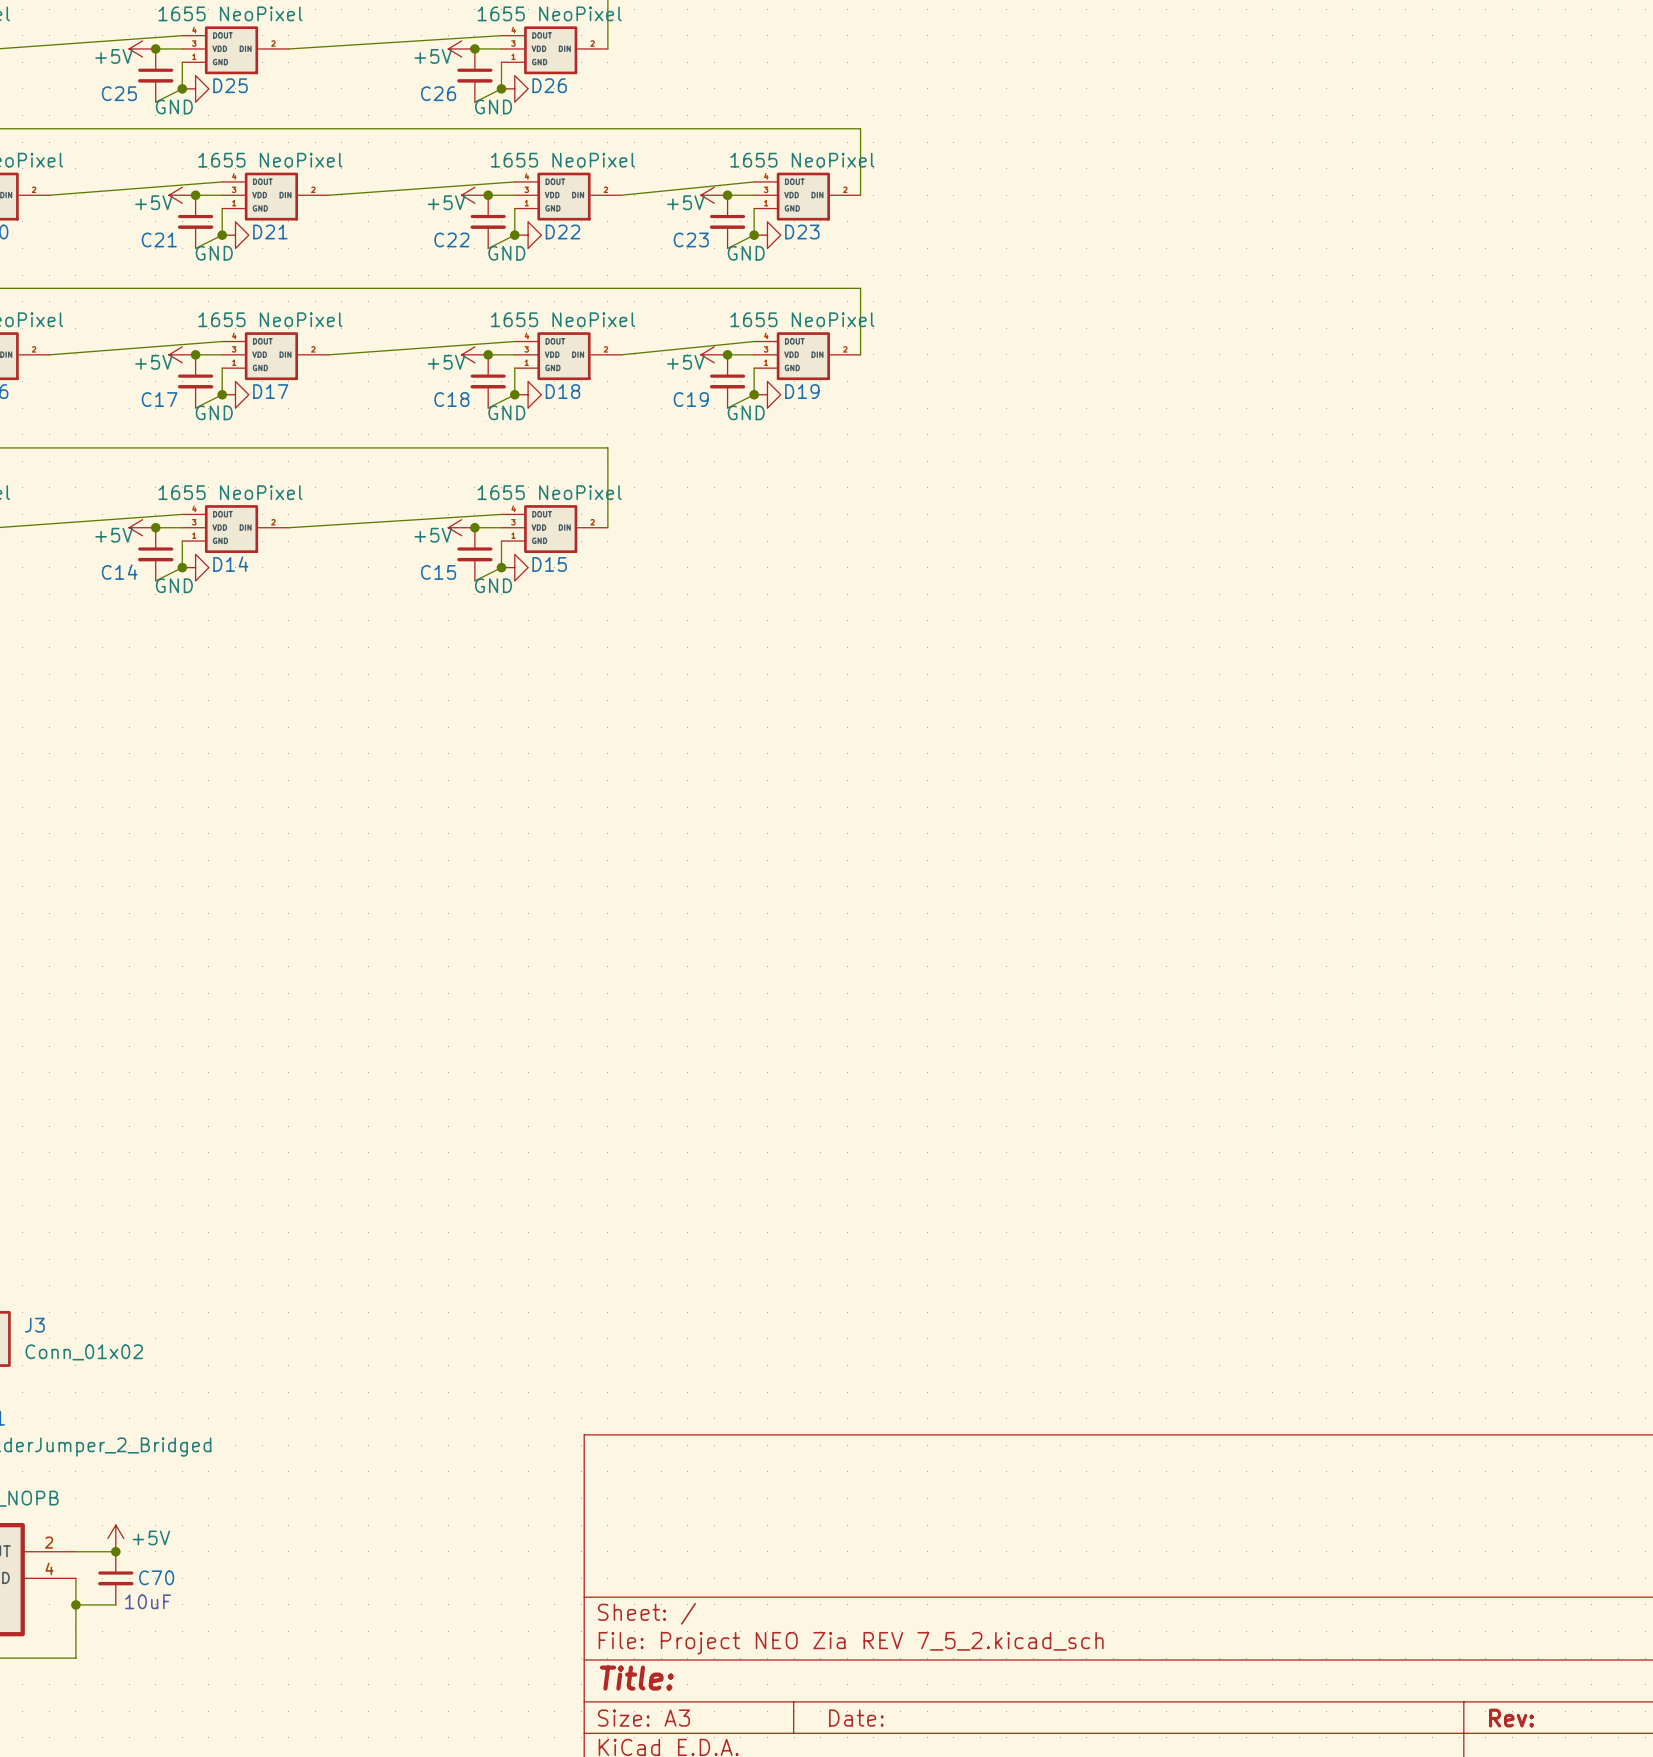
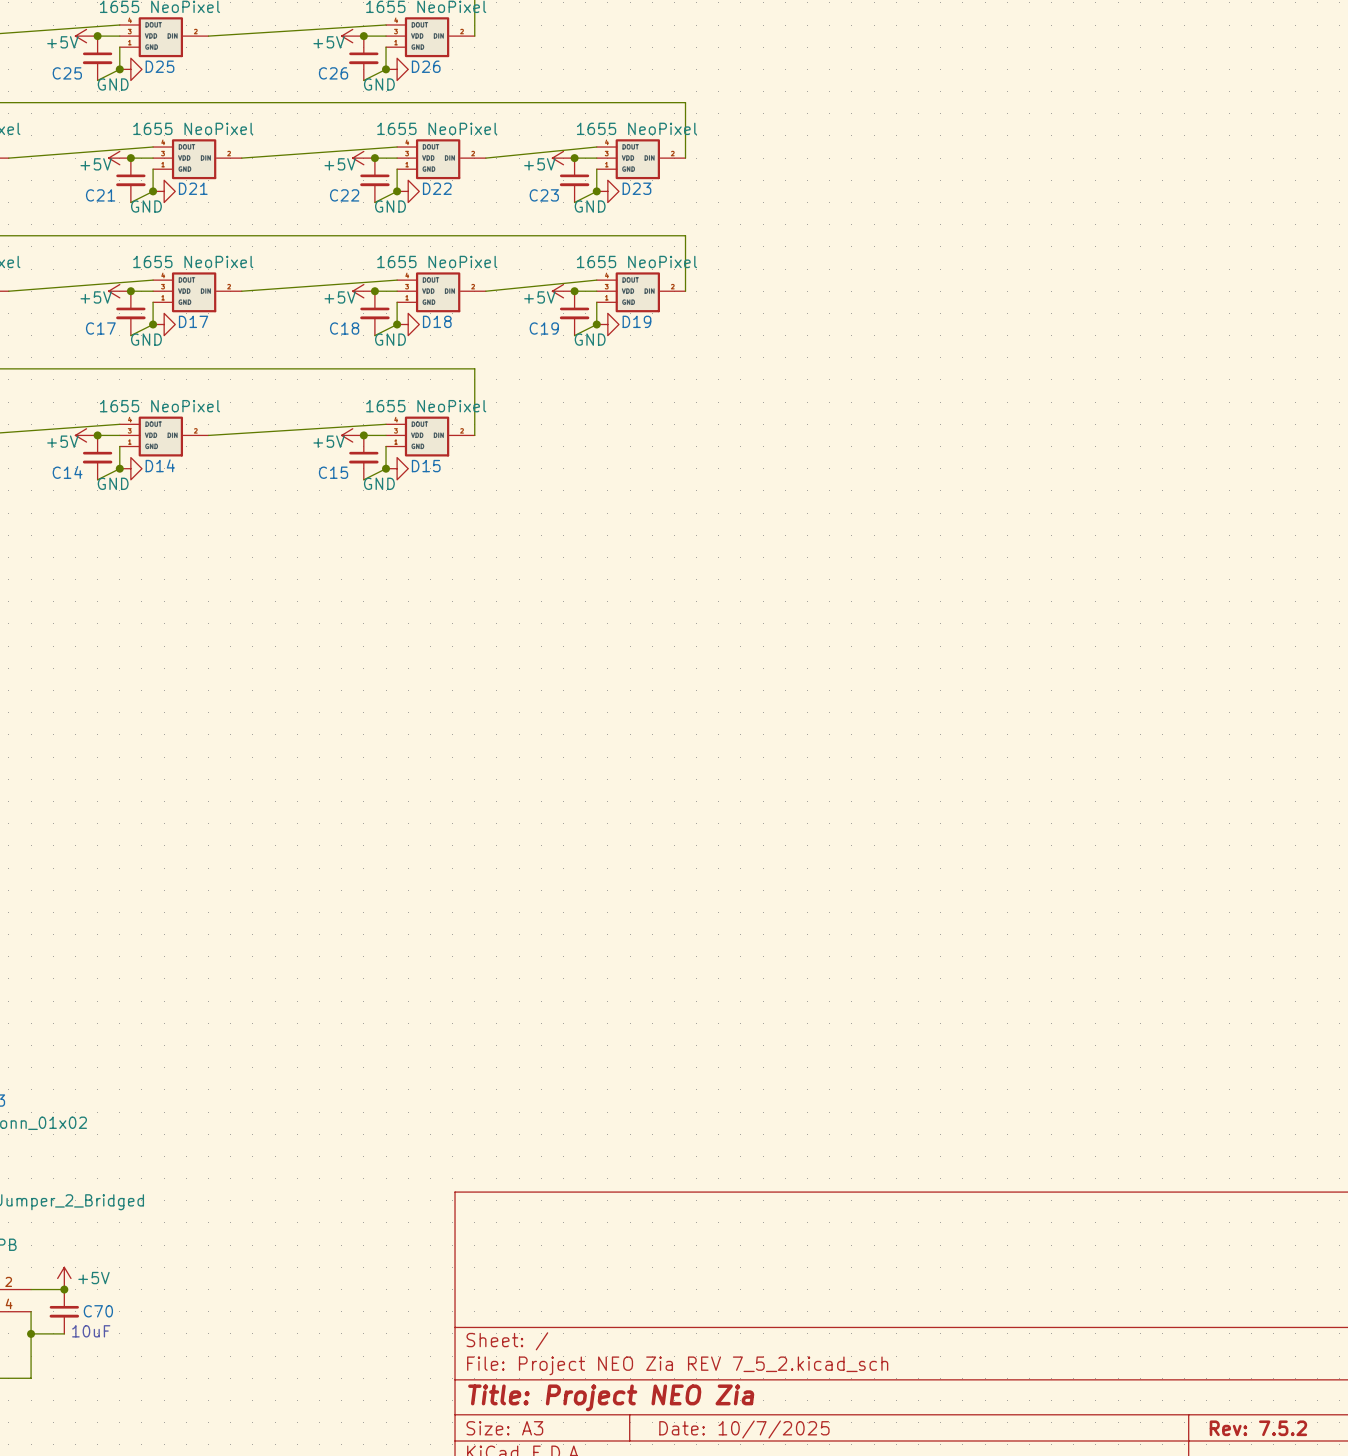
title block: Title: (636, 1678) -> Title: Project NEO Zia (611, 1397)
title block: Date: (856, 1718) -> Date: 10/7/2025 (744, 1429)
title block: Rev: (1511, 1718) -> Rev: 7.5.2 (1258, 1428)

